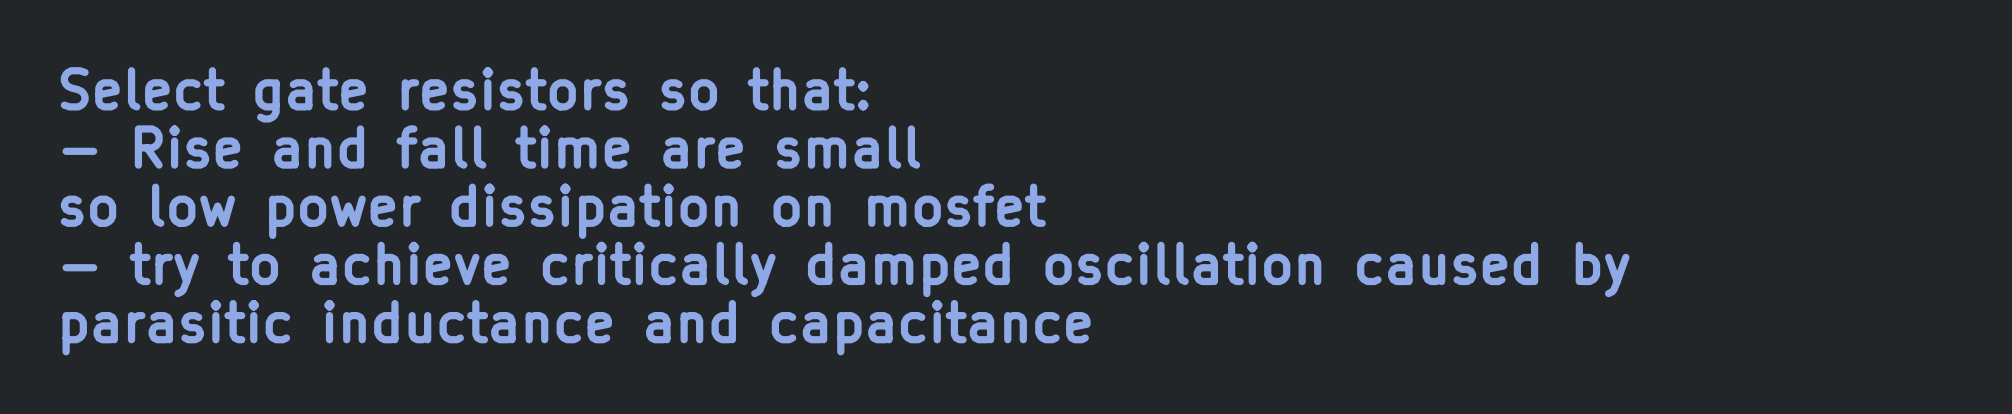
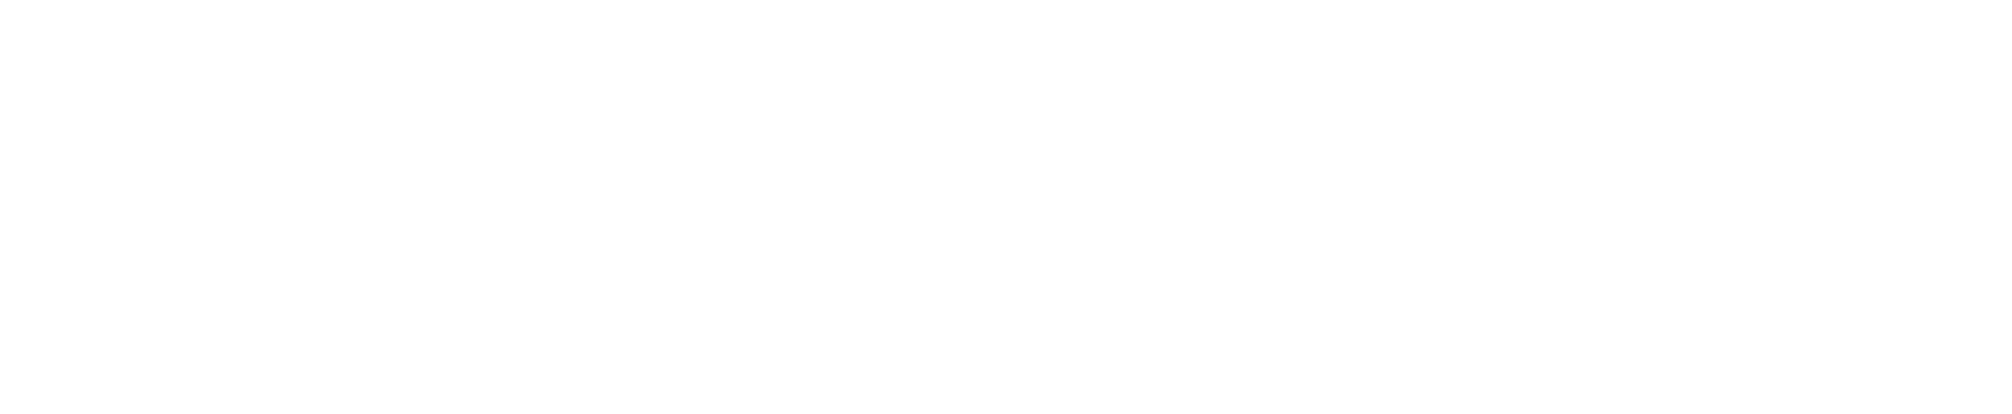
text: Select gate resistors so that: (464, 94) -> none
text: - Rise and fall time are small (491, 147) -> none
text: so low power dissipation on mosfet (553, 211) -> none
text: - try to achieve critically damped oscillation caused by (845, 269) -> none
text: parasitic inductance and capacitance (576, 327) -> none

